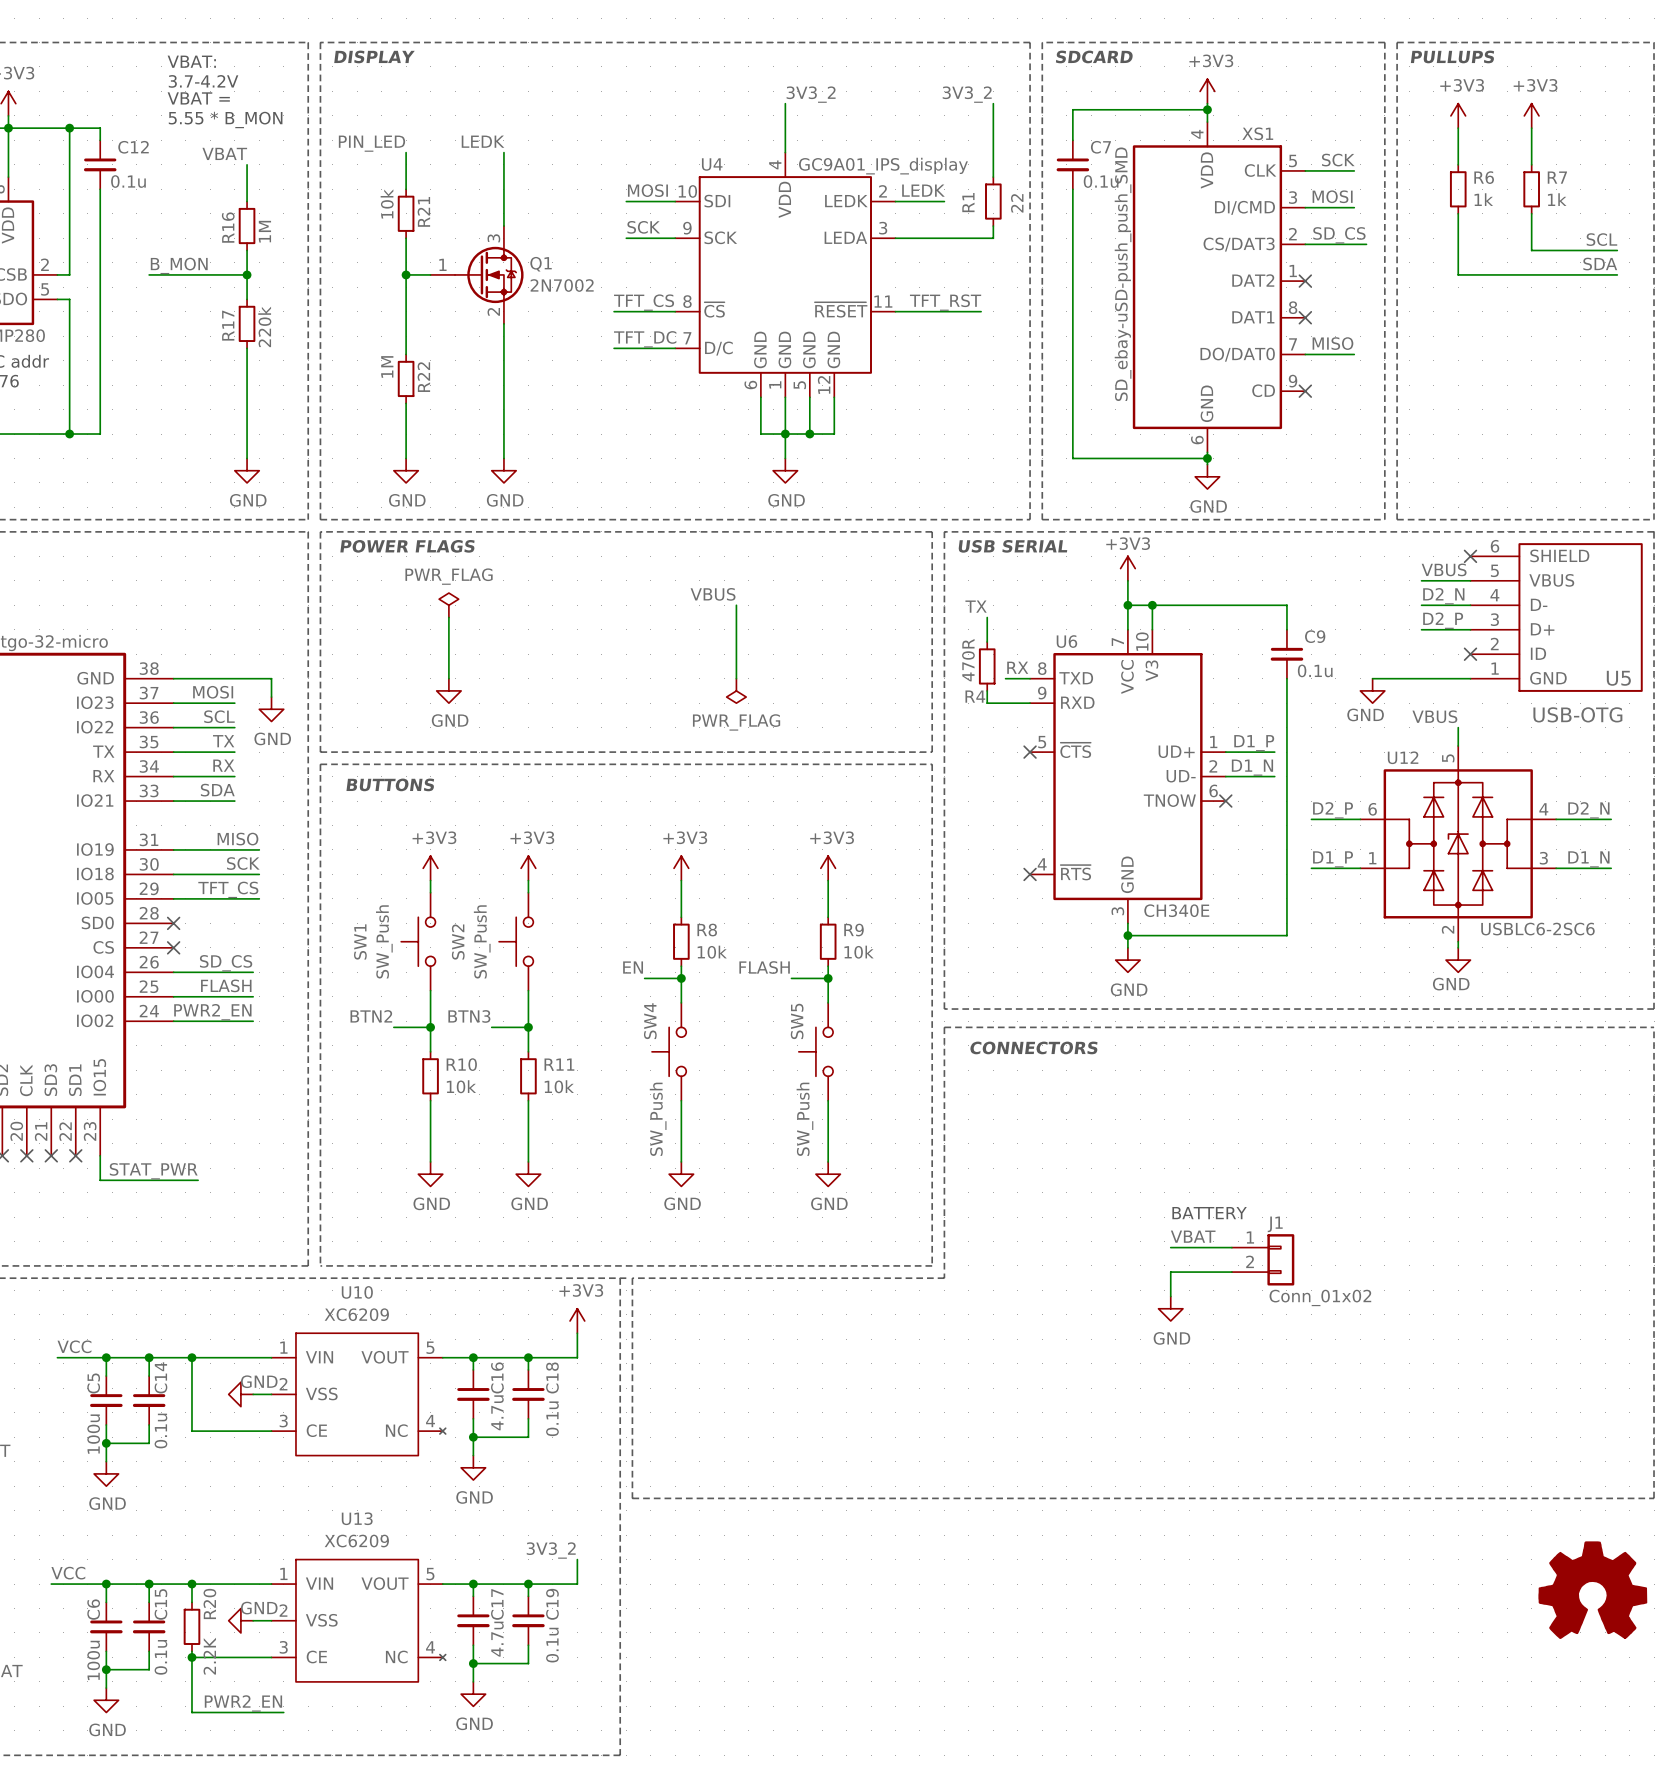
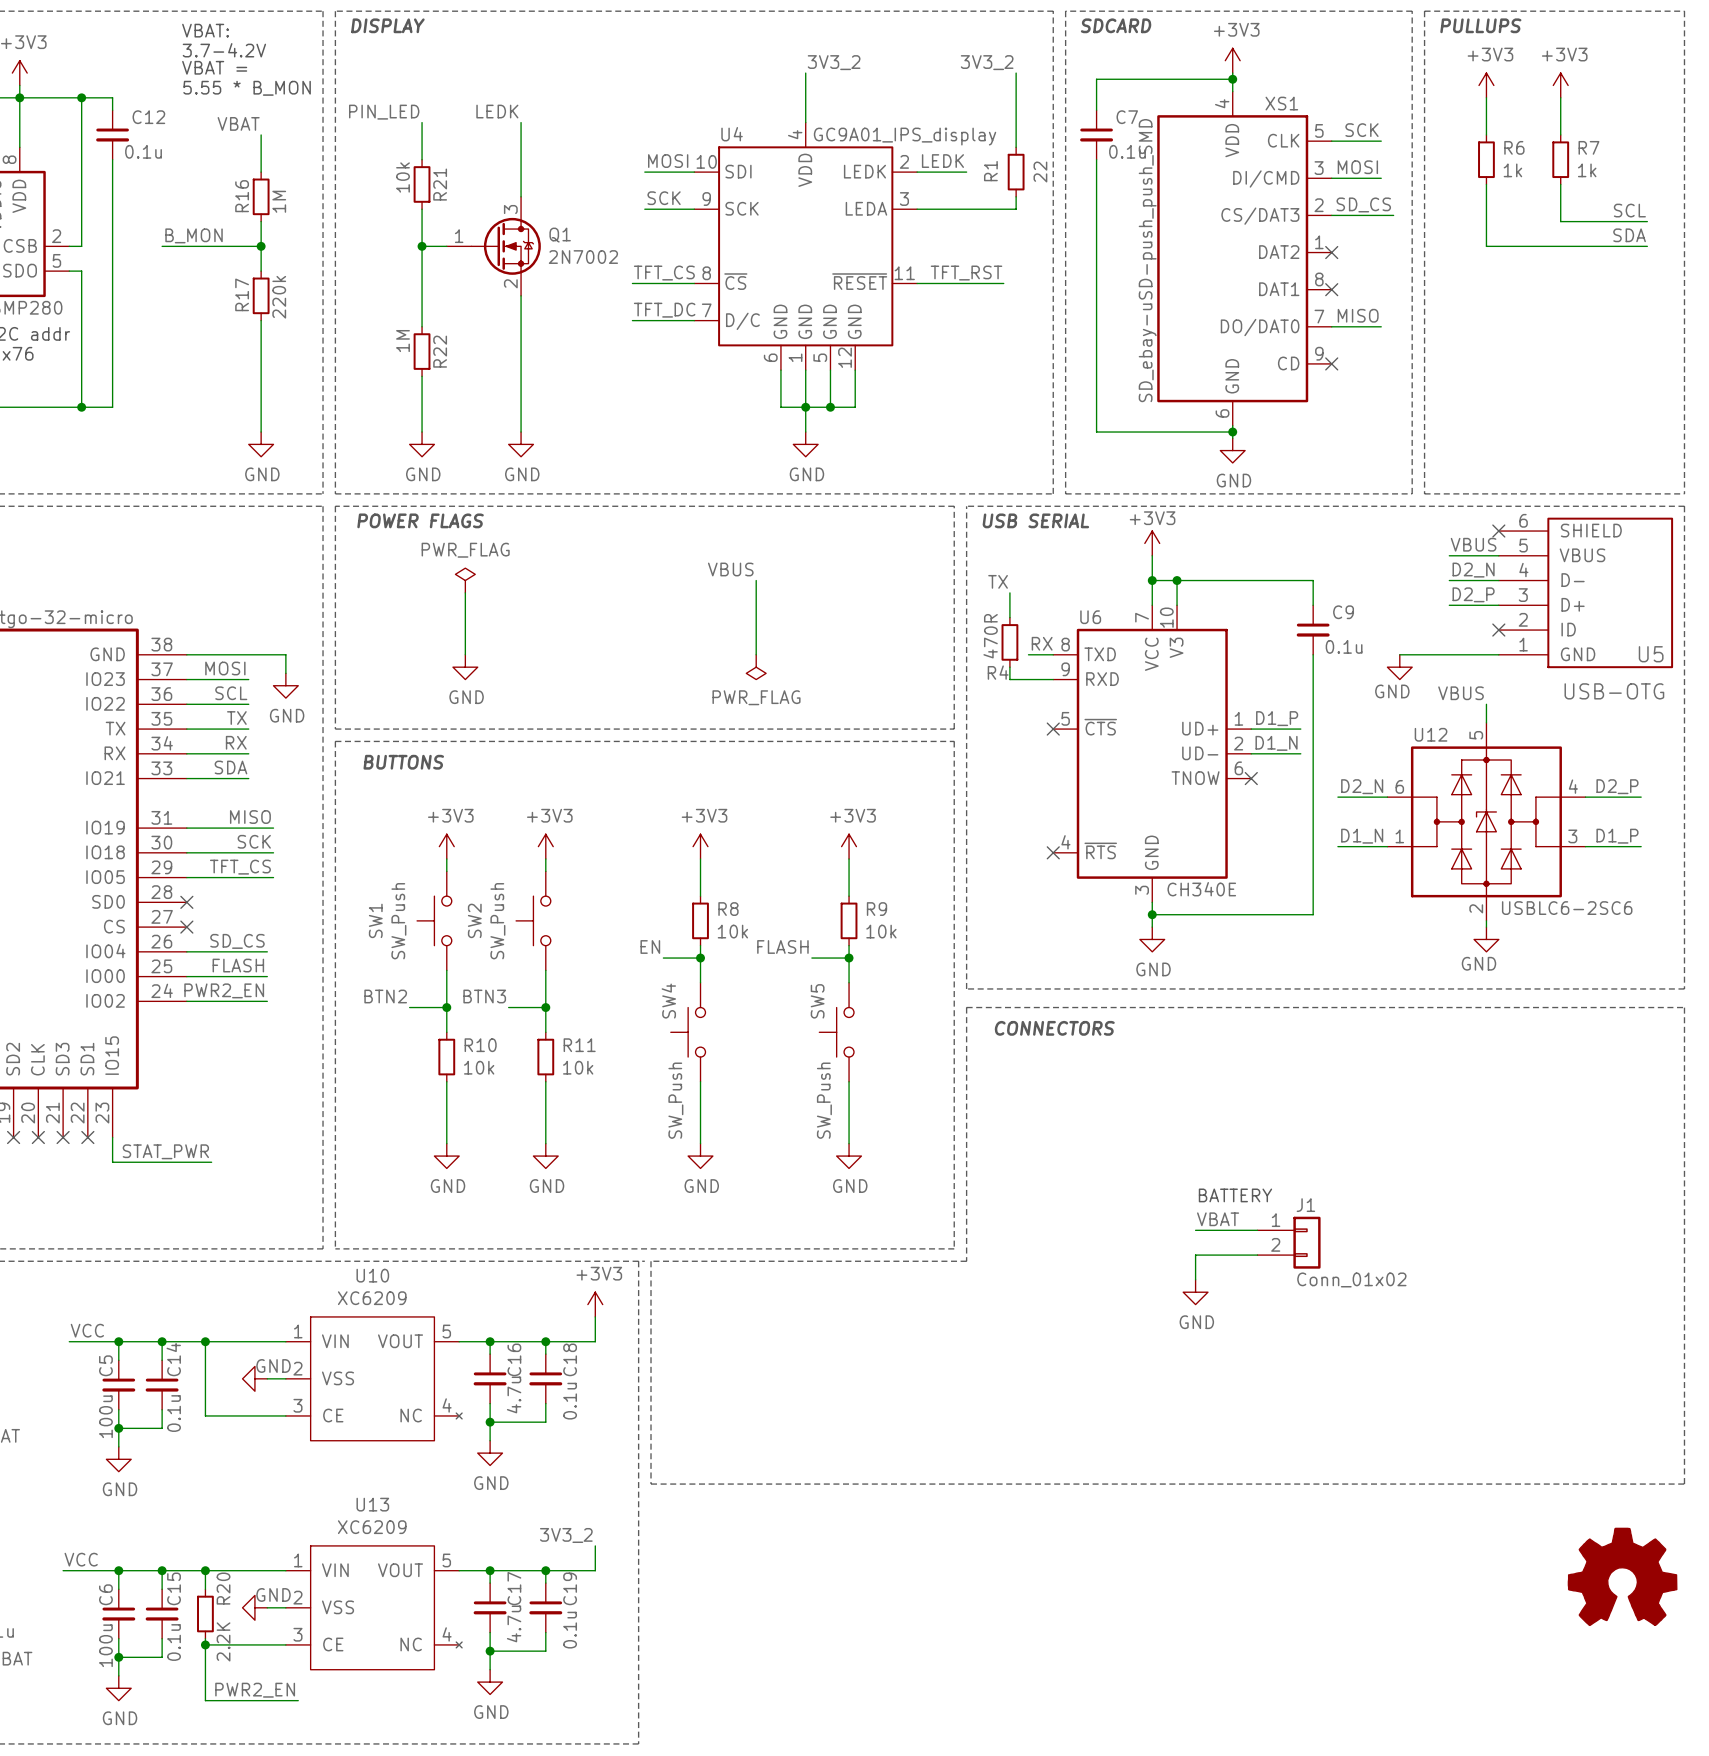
label: D2_P (1333, 810) -> D2_N (1362, 786)
label: D2_N (1588, 810) -> D2_P (1617, 786)
label: D1_P (1333, 859) -> D1_N (1362, 836)
label: D1_N (1588, 859) -> D1_P (1617, 836)

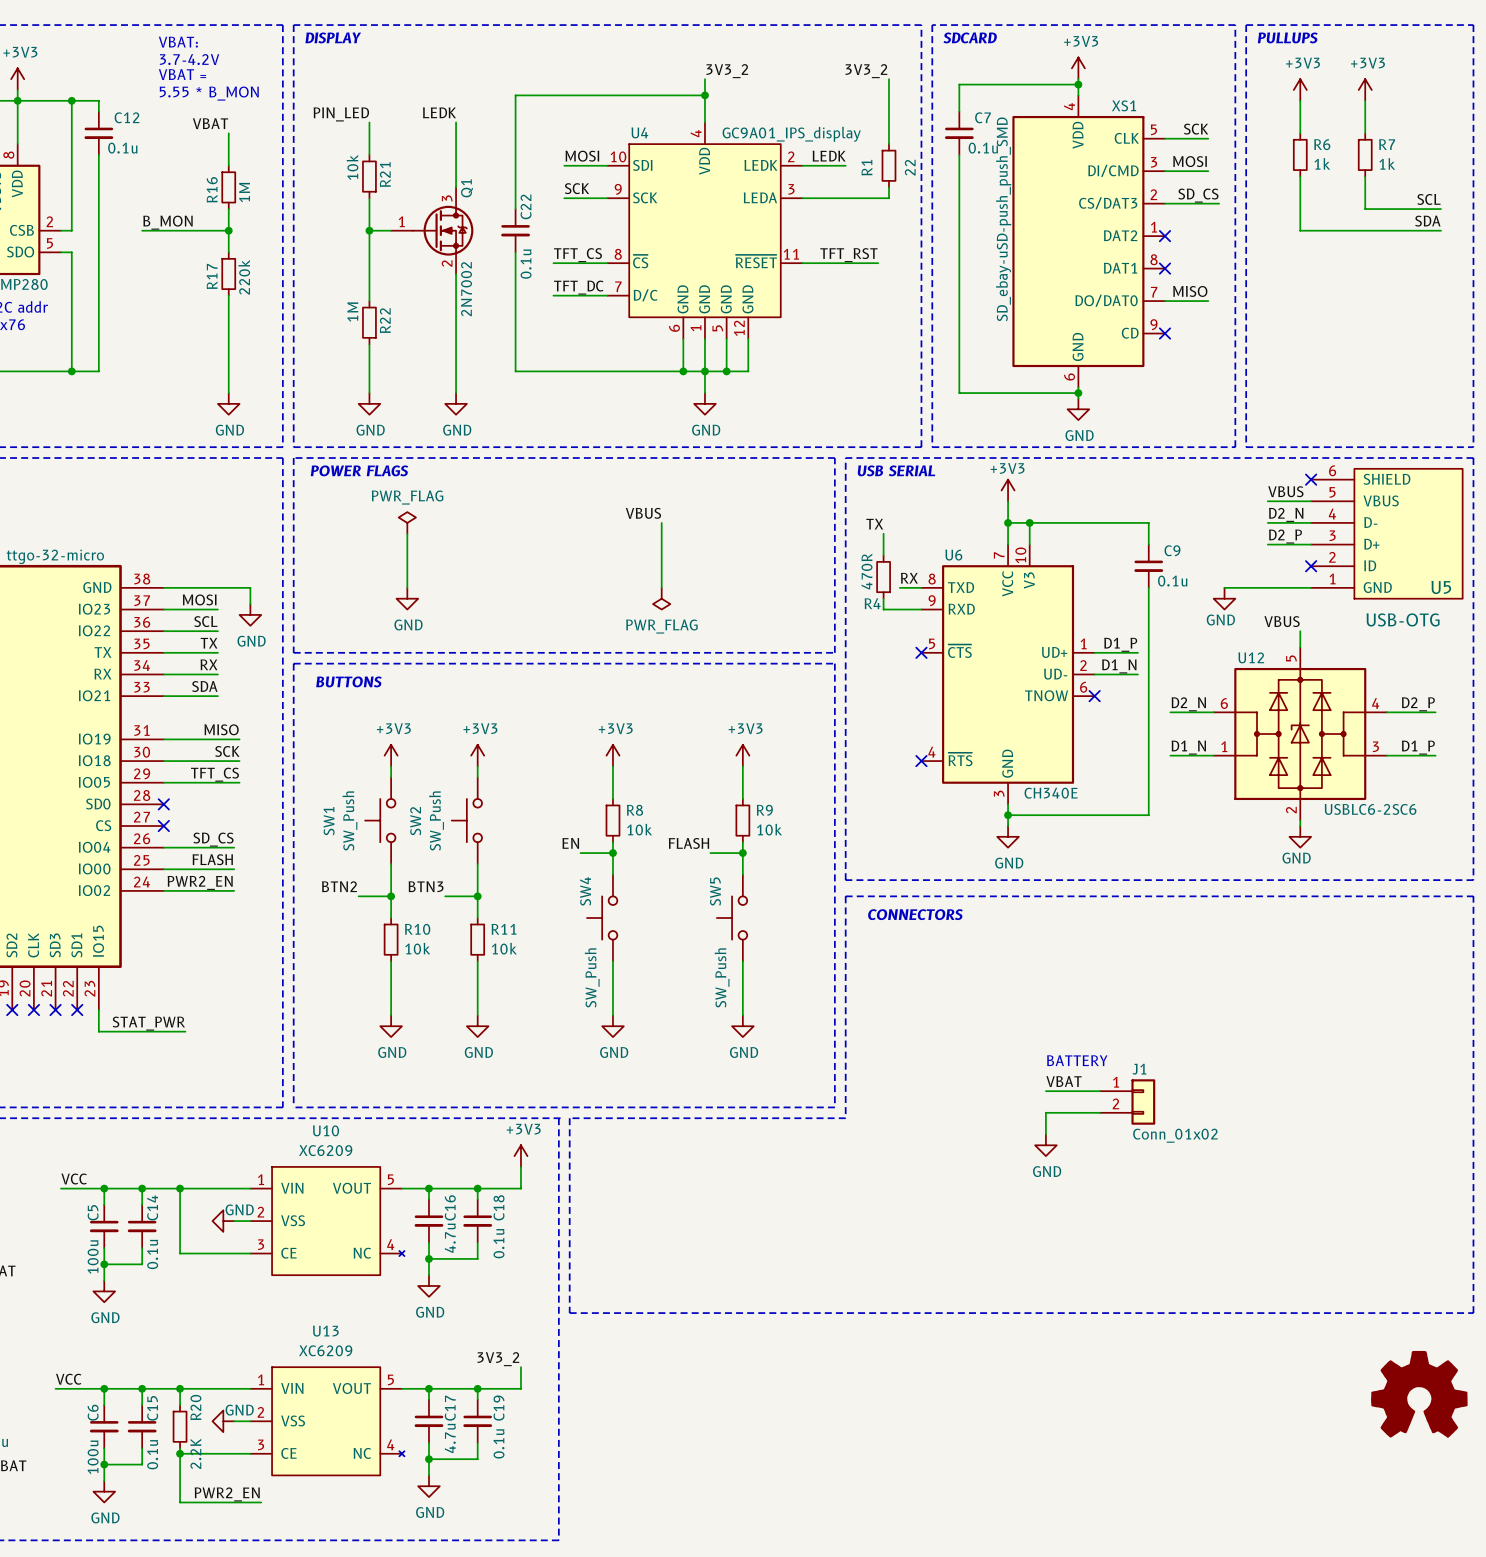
wire: none -> (704, 95) (515, 95) (515, 209)
junction: none -> (704, 95)
Q1 name rotation: 0° (560, 235) -> 90° counterclockwise (466, 188)
Q1 name position: Q1 (560, 235) -> Q1 (466, 188)
C22: none -> 0.1u (515, 230)
Q1 value rotation: 0° (583, 257) -> 90° counterclockwise (466, 289)
wire: none -> (515, 252) (515, 371) (683, 371)
junction: none -> (683, 371)

